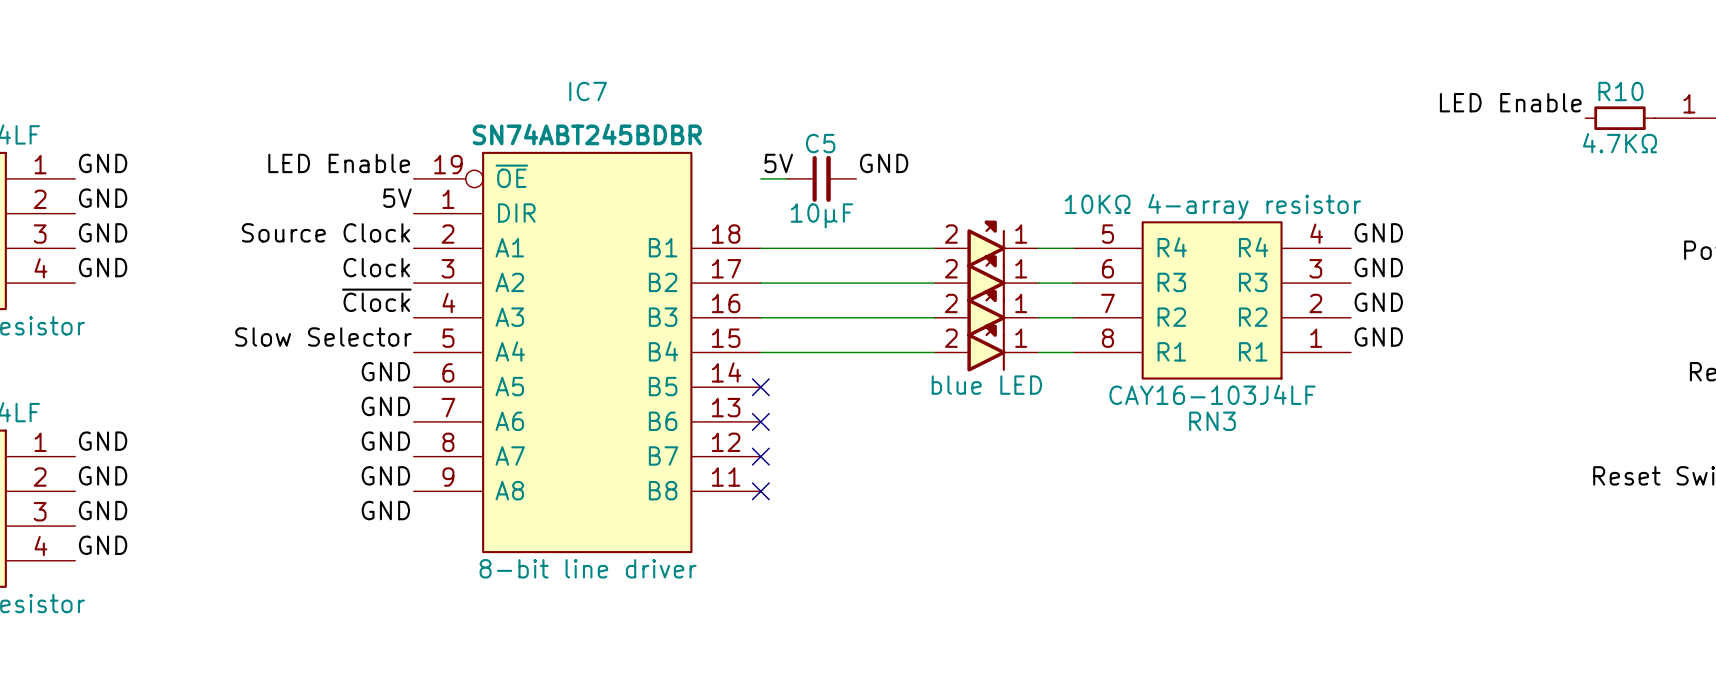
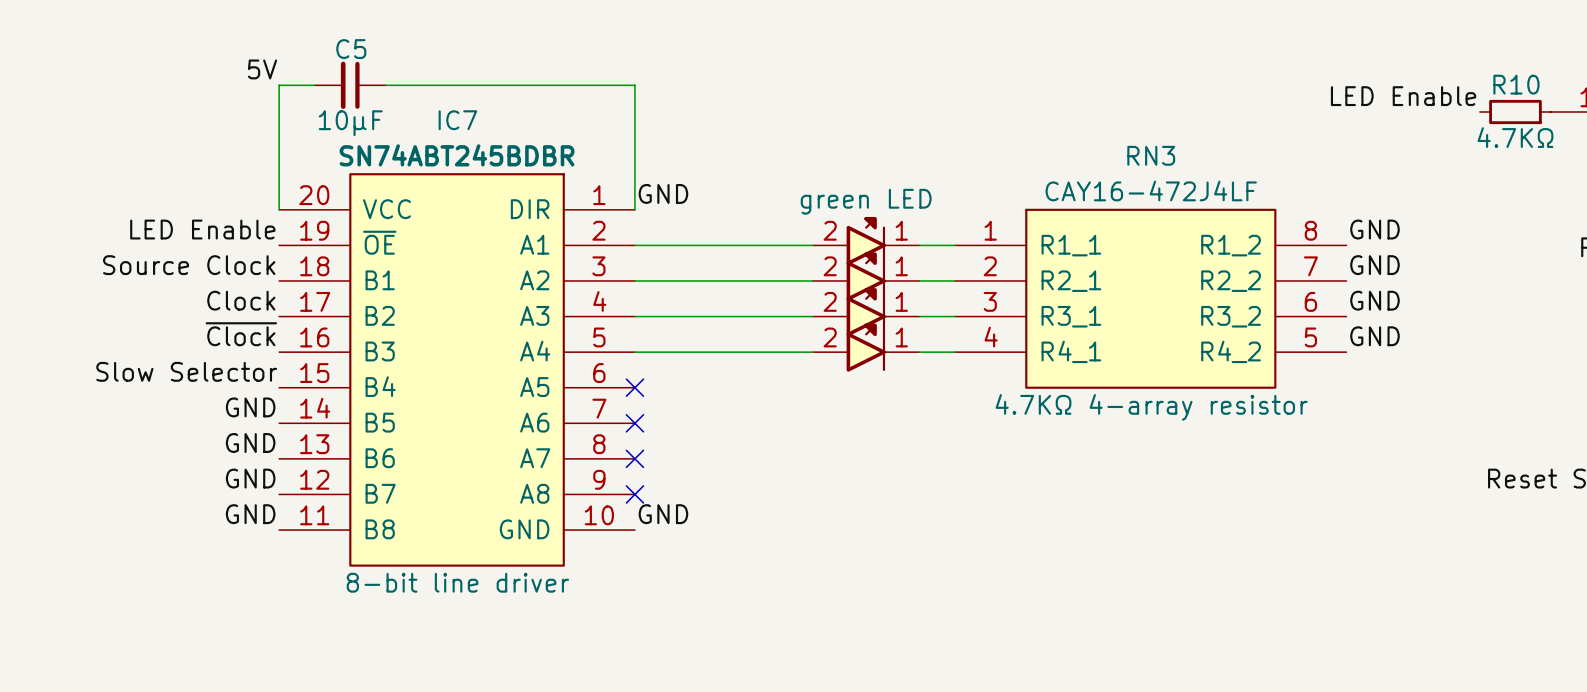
wire: none -> (314, 85) (279, 85) (279, 209)
wire: none -> (385, 85) (634, 85) (634, 209)
IC7 symbol: [413, 151, 761, 554] -> [279, 173, 635, 567]
label: LED Enable (339, 163) -> none
label: 5V (778, 163) -> none
label position: GND (884, 163) -> GND (663, 193)
wire: (760, 178) (786, 178) -> none
C5 rotation: 0° (821, 178) -> 180° (350, 85)
C5 position: (821, 178) -> (350, 85)
label position: 5V (397, 198) -> 5V (262, 69)
part text: none -> green LED (866, 201)
RN3 text: 10KΩ 4-array resistor (1212, 206) -> 4.7KΩ 4-array resistor (1151, 407)
RN3 symbol: [1073, 221, 1351, 380] -> [955, 208, 1347, 389]
label: Source Clock (325, 232) -> LED Enable (202, 229)
label: GND (1378, 232) -> none
label: none -> GND (1374, 229)
label: Clock (376, 267) -> Source Clock (189, 265)
label: GND (1378, 267) -> none
label: none -> GND (1374, 265)
label: ~{Clock} (376, 300) -> Clock (241, 300)
label: GND (1378, 302) -> none
label: none -> GND (1374, 300)
label: Slow Selector (323, 337) -> ~{Clock} (241, 334)
label: GND (1378, 337) -> none
label: none -> GND (1374, 336)
label: GND (385, 371) -> Slow Selector (186, 371)
part text: blue LED (986, 385) -> none
RN3 value: CAY16-103J4LF (1212, 394) -> CAY16-472J4LF (1151, 190)
RN3 name position: RN3 (1212, 421) -> RN3 (1151, 155)
label: none -> GND (663, 514)

